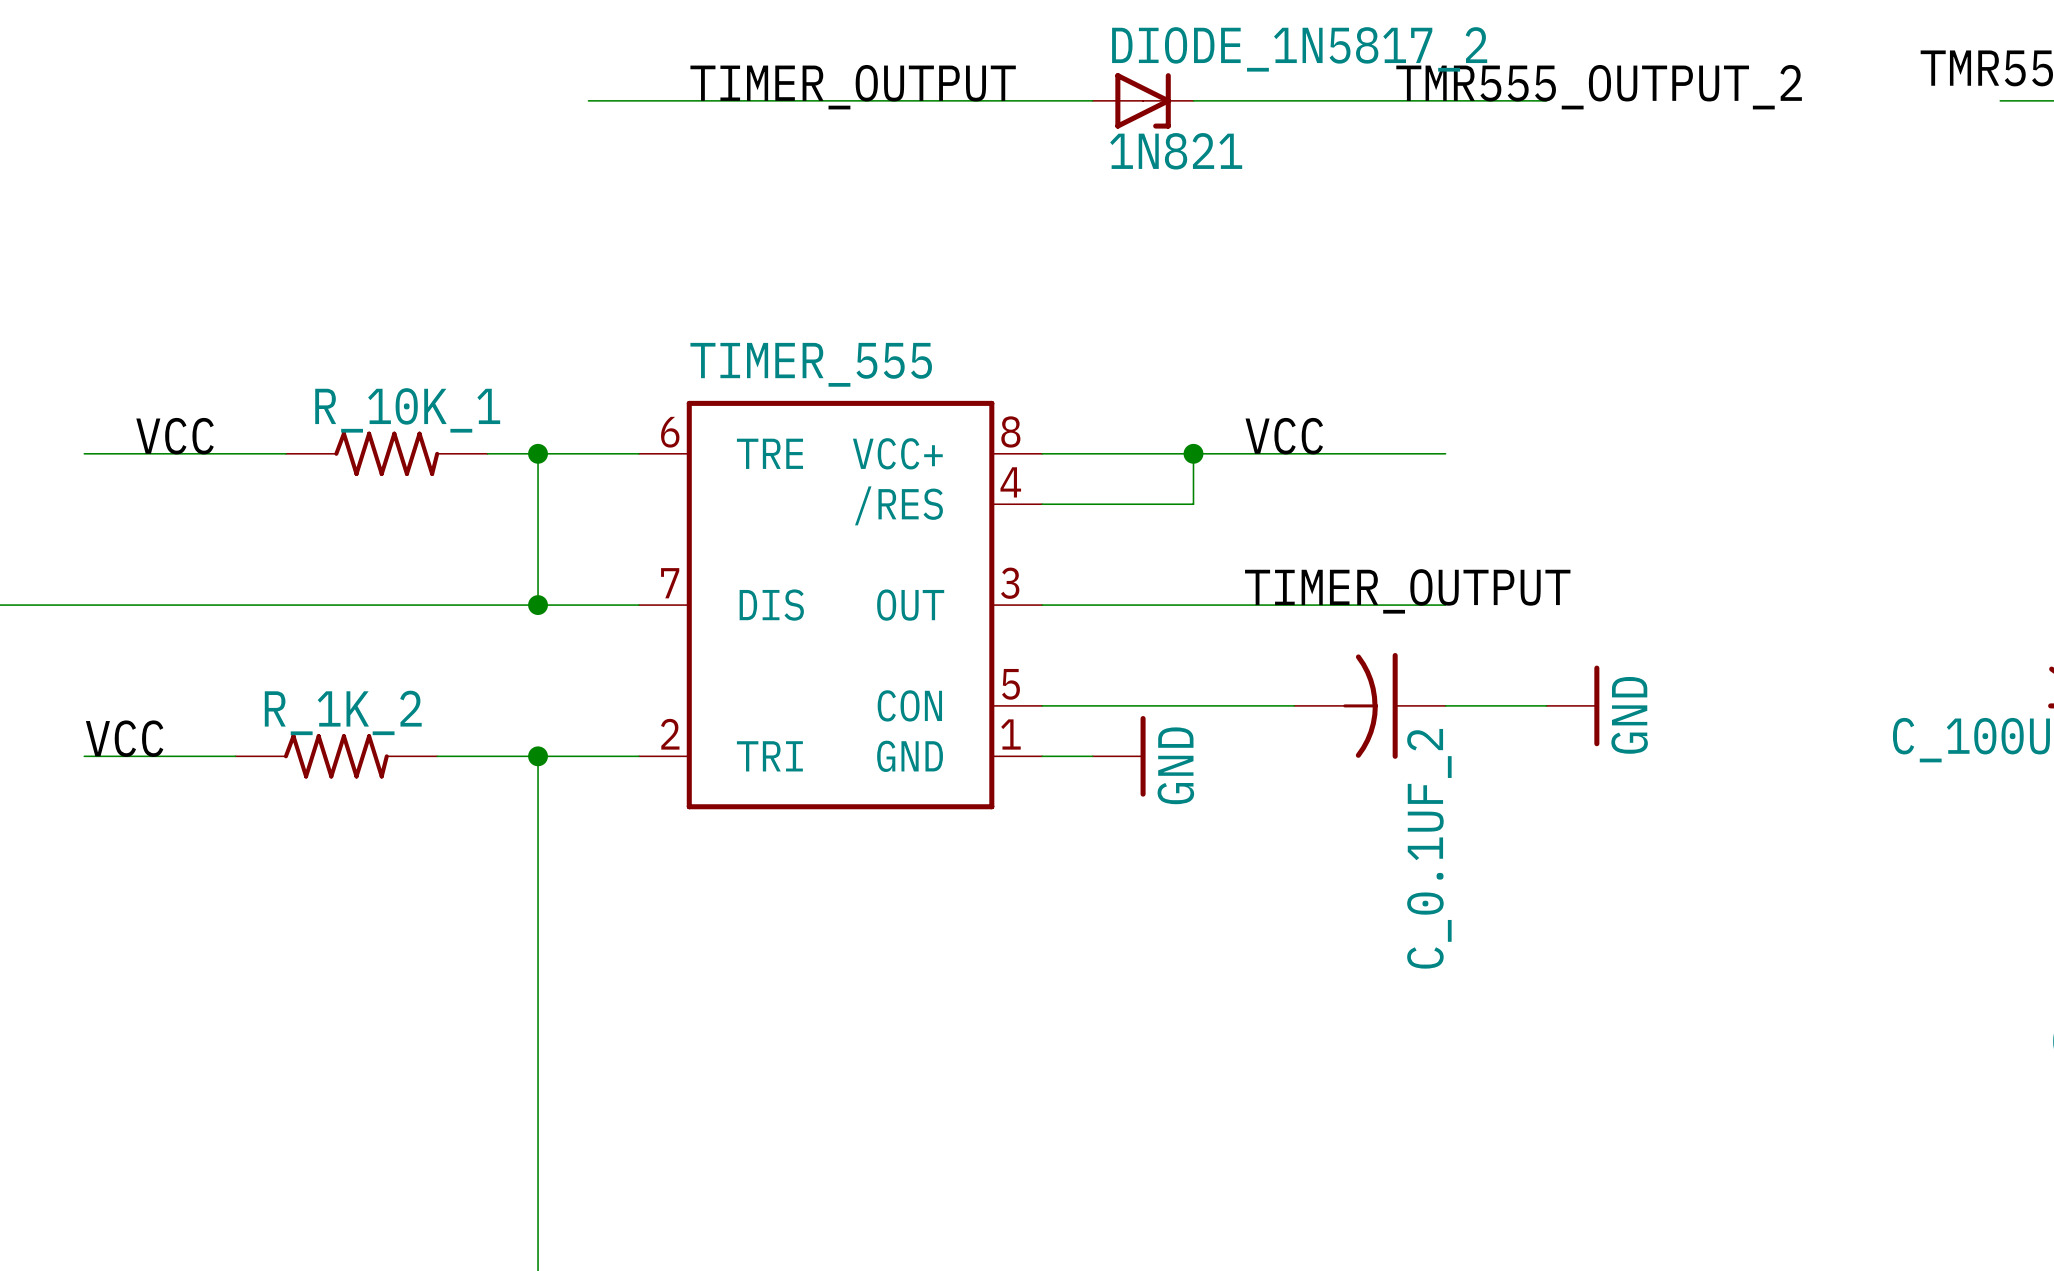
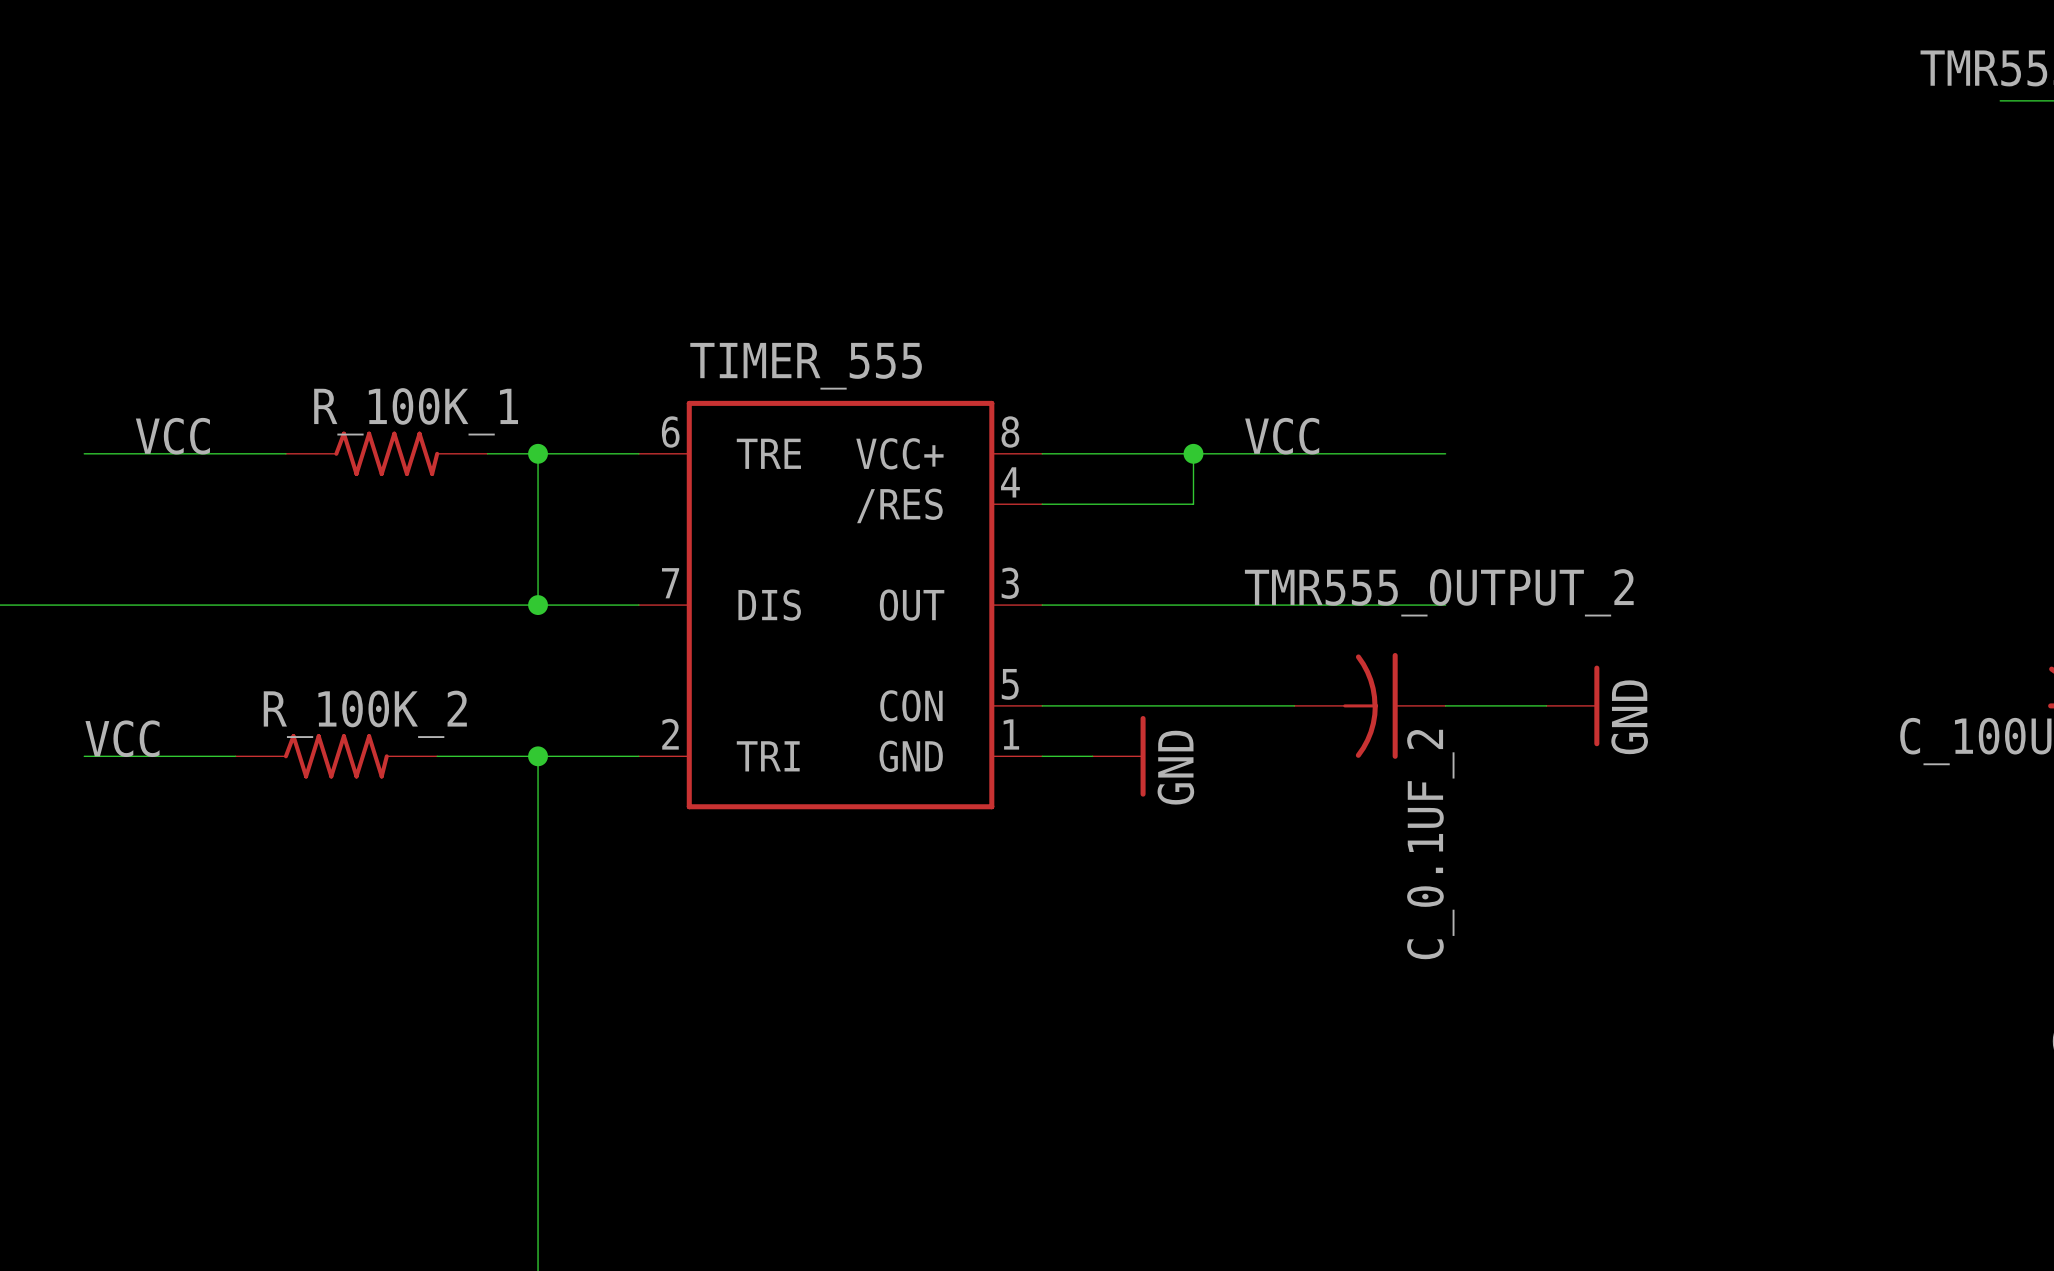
label: TIMER_OUTPUT (853, 87) -> none
label: TMR555_OUTPUT_2 (1599, 87) -> none
wire: (588, 100) (1092, 100) -> none
DIODE_1N5817_2: 1N821 (1143, 100) -> none
wire: (1193, 100) (1546, 100) -> none
R_10K_1 name: R_10K_1 (407, 410) -> R_100K_1 (416, 411)
label: TIMER_OUTPUT (1407, 591) -> TMR555_OUTPUT_2 (1439, 592)
R_1K_2 name: R_1K_2 (343, 712) -> R_100K_2 (365, 714)

